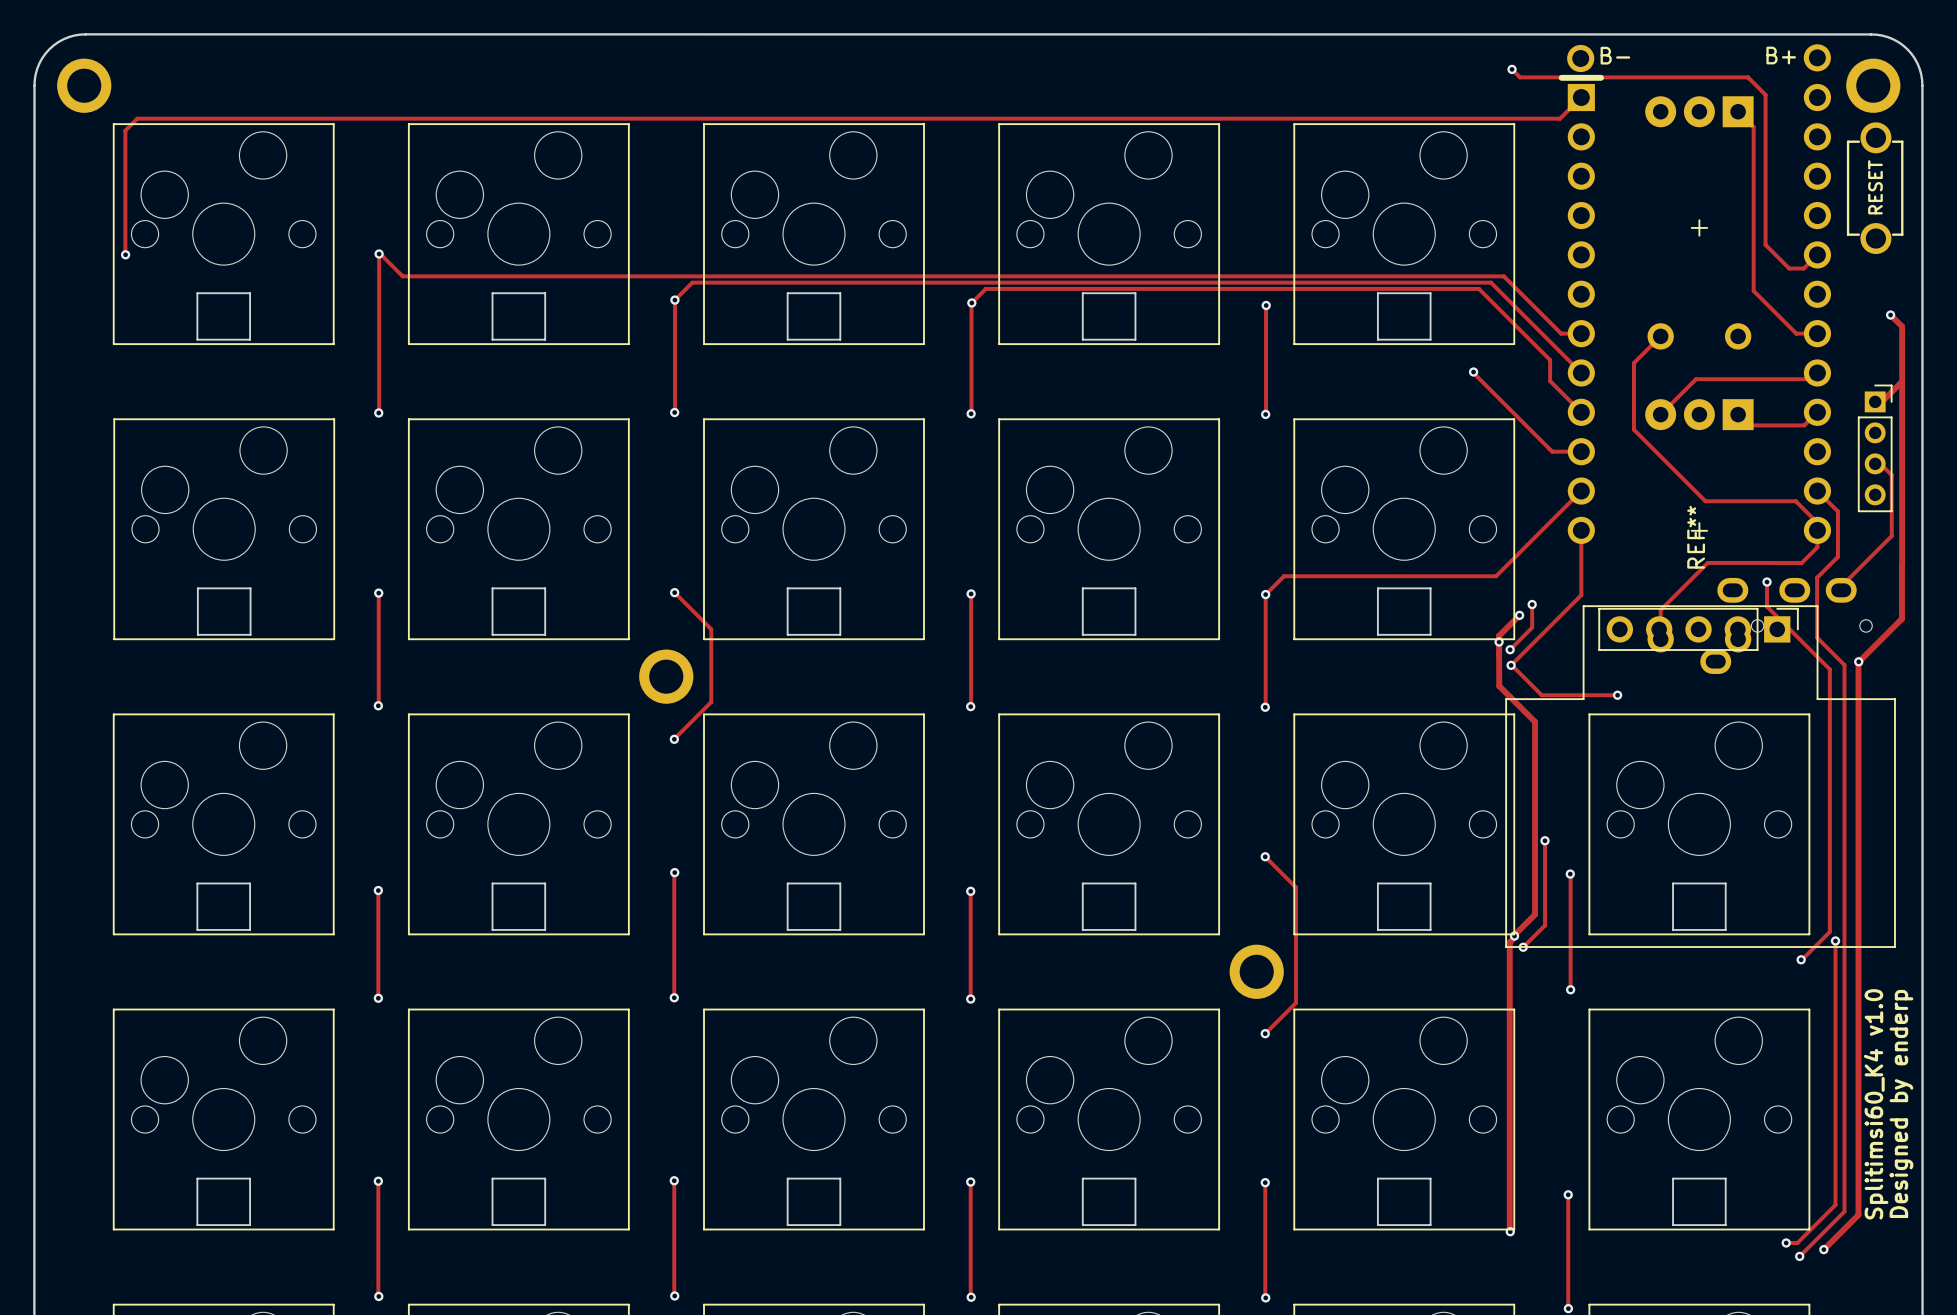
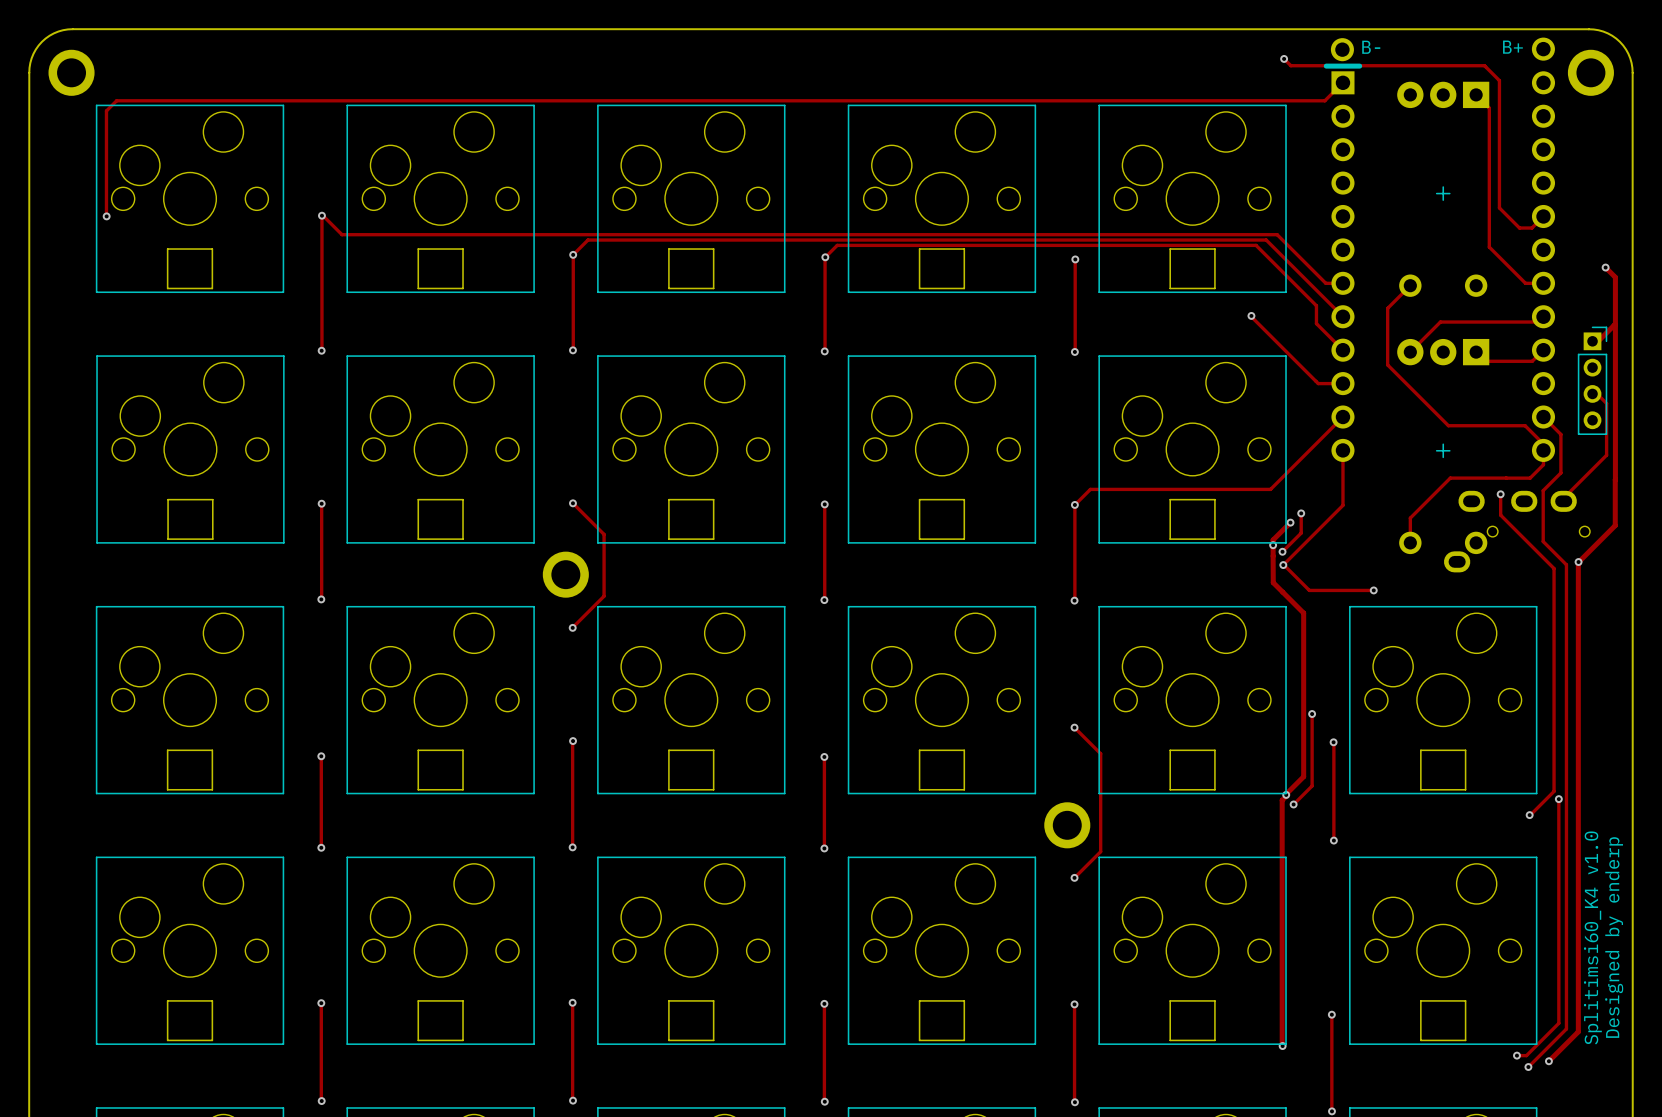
part: (1875, 188) -> none
REF**: (1700, 776) -> none

